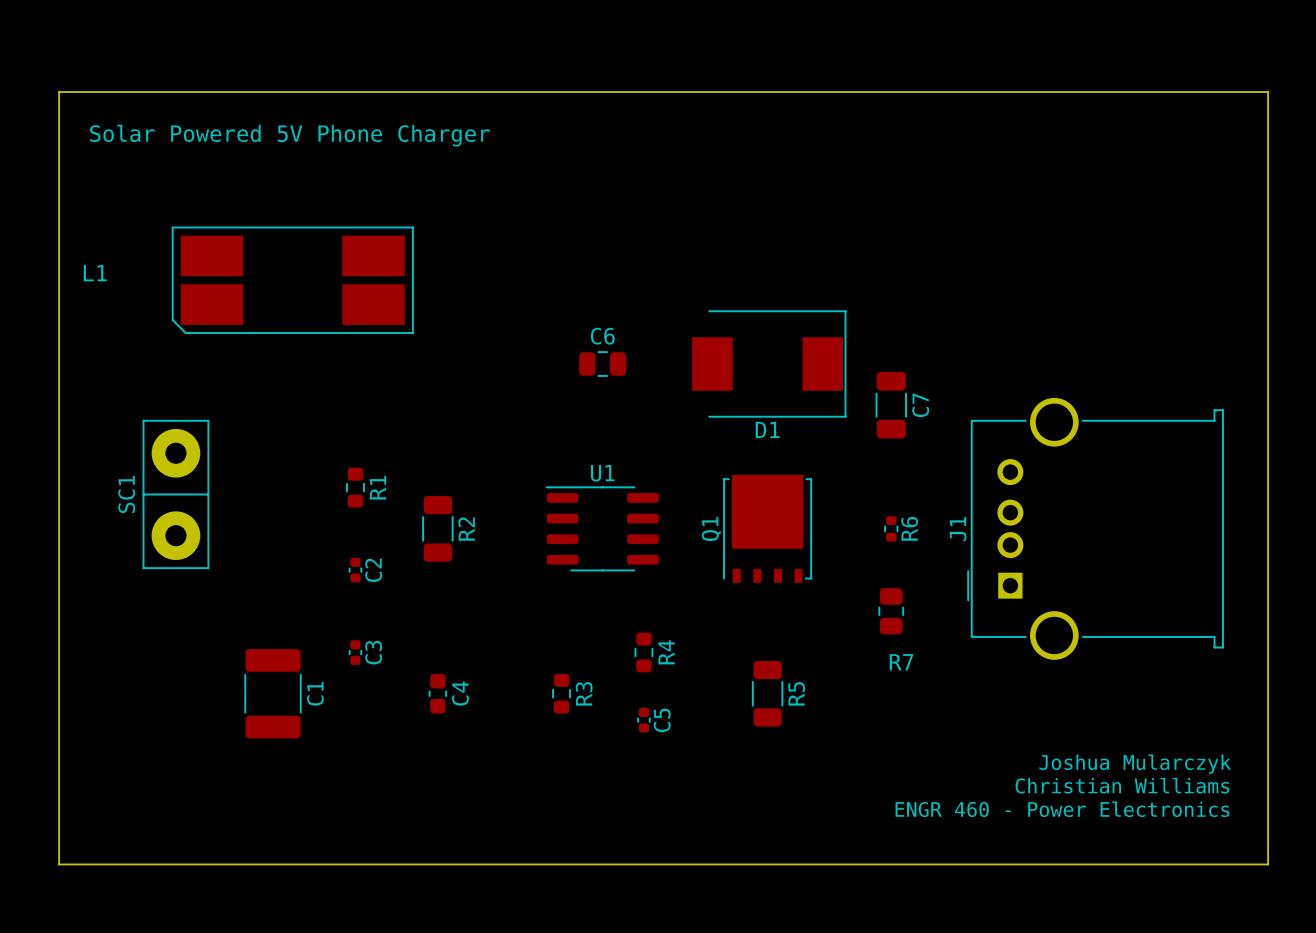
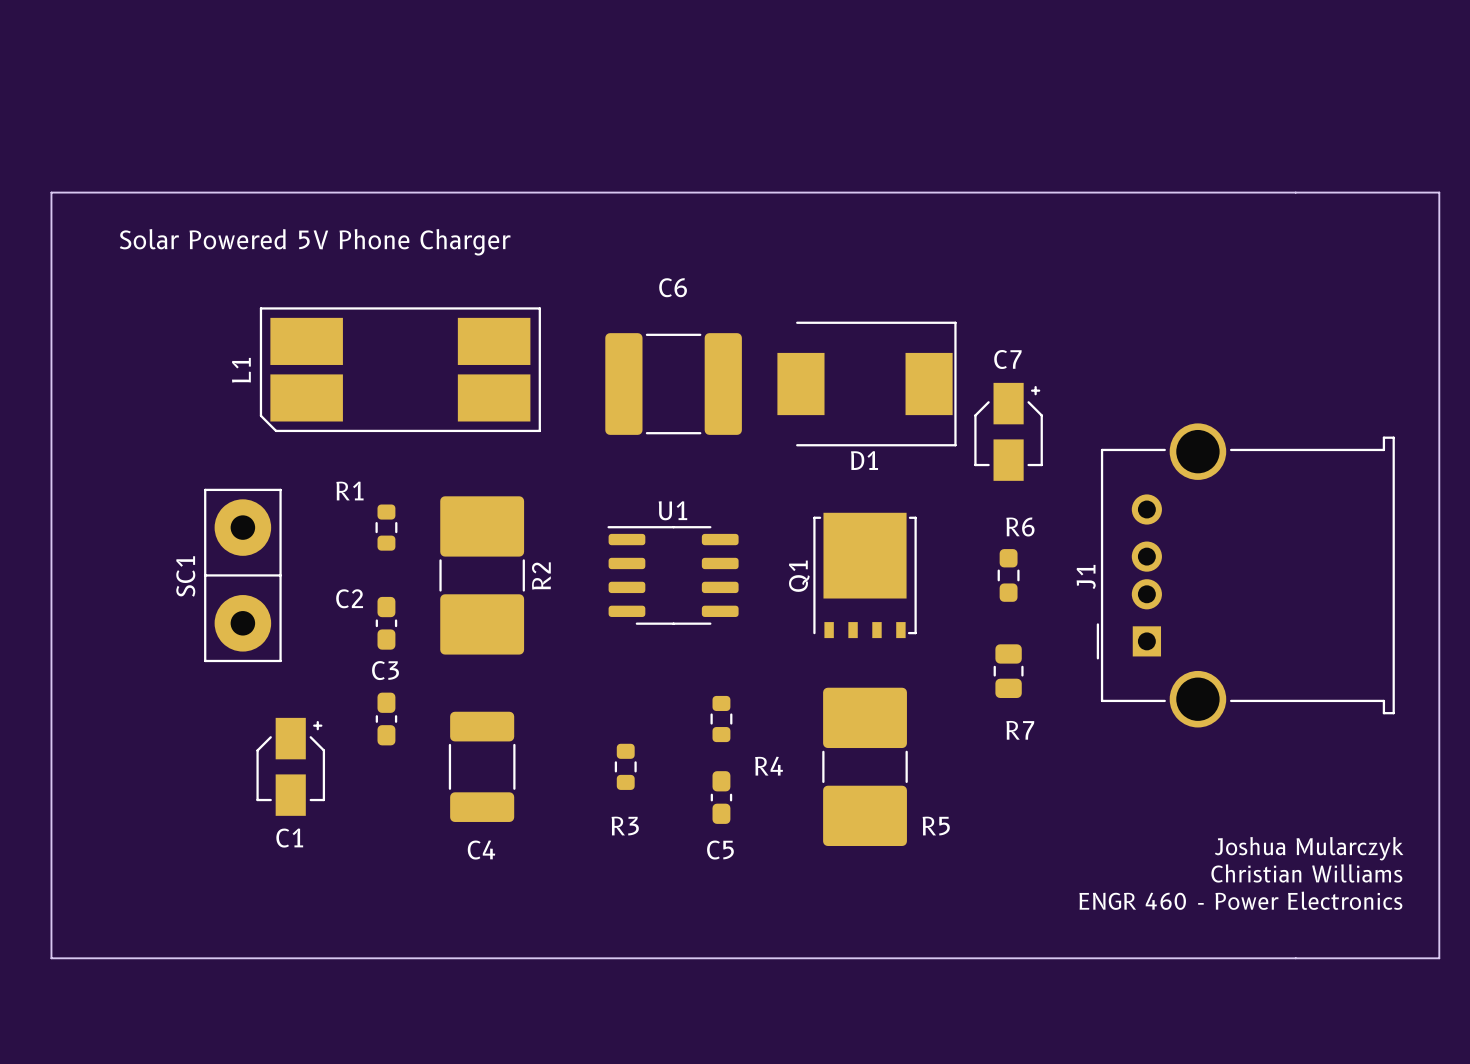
board edge: (59, 92) (59, 864) (1268, 864) (1268, 92) (59, 92) -> (51, 192) (51, 958) (1439, 958) (1439, 192) (51, 192)
text position: Solar Powered 5V Phone Charger (289, 135) -> Solar Powered 5V Phone Charger (315, 242)
L1 name rotation: 0° (95, 273) -> 90° counterclockwise (241, 370)
L1 name position: L1 (95, 273) -> L1 (241, 370)
L1 position: (292, 280) -> (400, 369)
C6 name position: C6 (602, 336) -> C6 (673, 287)
C6 footprint: [579, 351, 627, 377] -> [605, 333, 742, 435]
C7 footprint: [875, 371, 908, 439] -> [974, 382, 1043, 481]
C7 name position: C7 (920, 405) -> C7 (1007, 359)
R1 name rotation: 0° (378, 487) -> 90° clockwise (349, 490)
R1 name position: R1 (378, 487) -> R1 (349, 490)
SC1 position: (175, 494) -> (242, 575)
R2 footprint: [422, 496, 454, 562] -> [439, 496, 525, 655]
R6 footprint: [884, 516, 899, 542] -> [997, 549, 1020, 602]
R6 name rotation: 0° (909, 528) -> 90° clockwise (1020, 527)
R6 name position: R6 (909, 528) -> R6 (1020, 527)
C2 footprint: [348, 557, 363, 583] -> [375, 596, 398, 650]
C2 name rotation: 0° (373, 570) -> 90° clockwise (349, 598)
C2 name position: C2 (373, 570) -> C2 (349, 598)
C3 footprint: [348, 640, 363, 665] -> [375, 692, 398, 746]
C1 footprint: [244, 649, 302, 739] -> [256, 717, 326, 816]
C3 name rotation: 0° (373, 652) -> 90° clockwise (385, 670)
C3 name position: C3 (373, 652) -> C3 (385, 670)
R4 name rotation: 0° (666, 652) -> 90° clockwise (769, 766)
R4 name position: R4 (666, 652) -> R4 (769, 766)
R5 footprint: [751, 660, 784, 727] -> [822, 687, 908, 847]
C4 footprint: [428, 673, 448, 714] -> [448, 711, 516, 822]
C1 name position: C1 (315, 693) -> C1 (289, 838)
C4 name position: C4 (460, 693) -> C4 (481, 850)
R3 name rotation: 0° (584, 693) -> 90° clockwise (625, 826)
R3 name position: R3 (584, 693) -> R3 (625, 826)
R5 name position: R5 (796, 693) -> R5 (936, 826)
C5 footprint: [637, 707, 651, 733] -> [710, 771, 733, 824]
C5 name rotation: 0° (662, 720) -> 90° clockwise (720, 850)
C5 name position: C5 (662, 720) -> C5 (720, 850)

